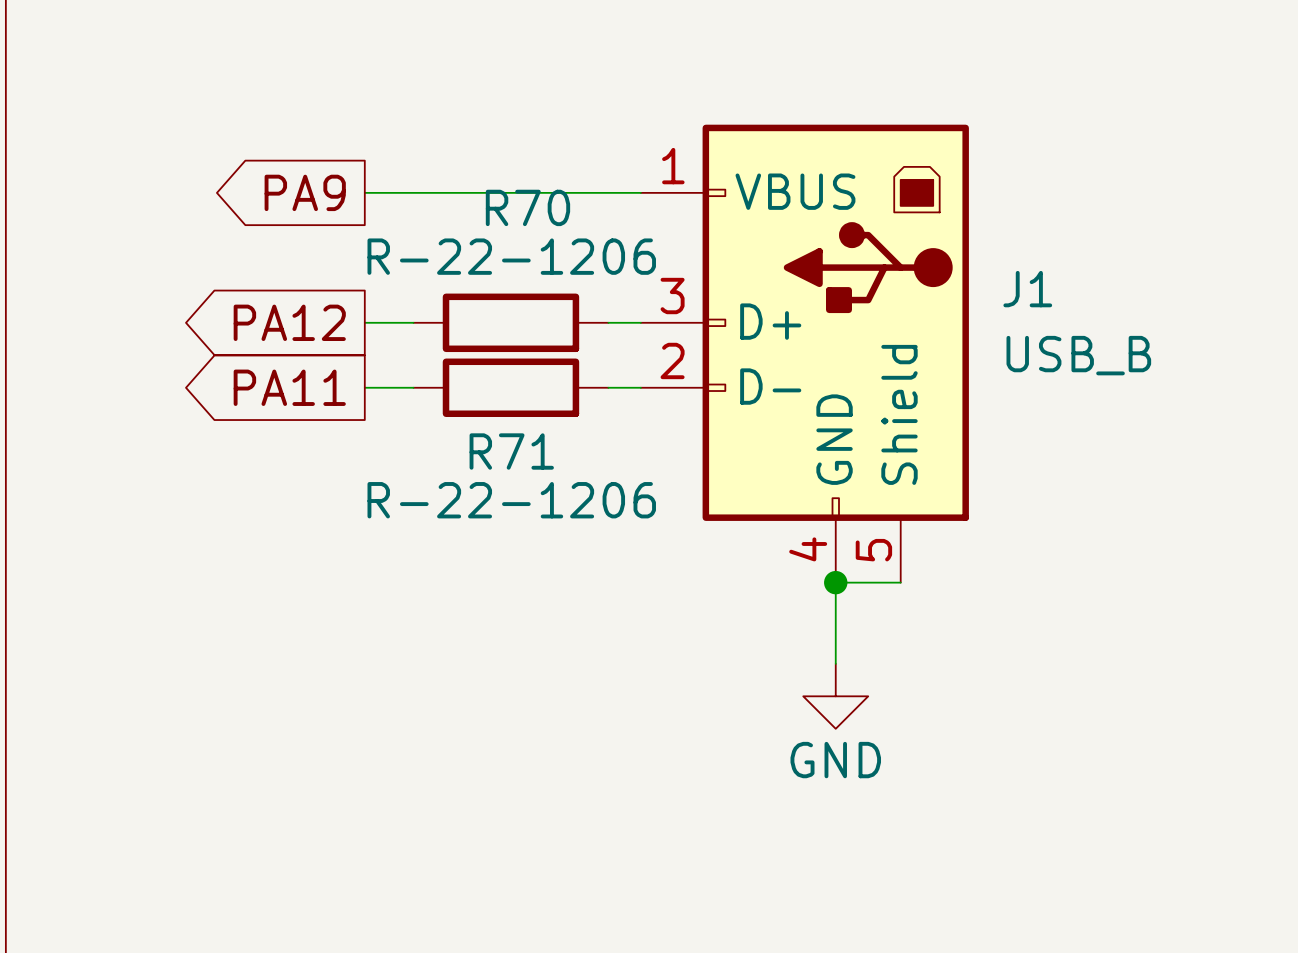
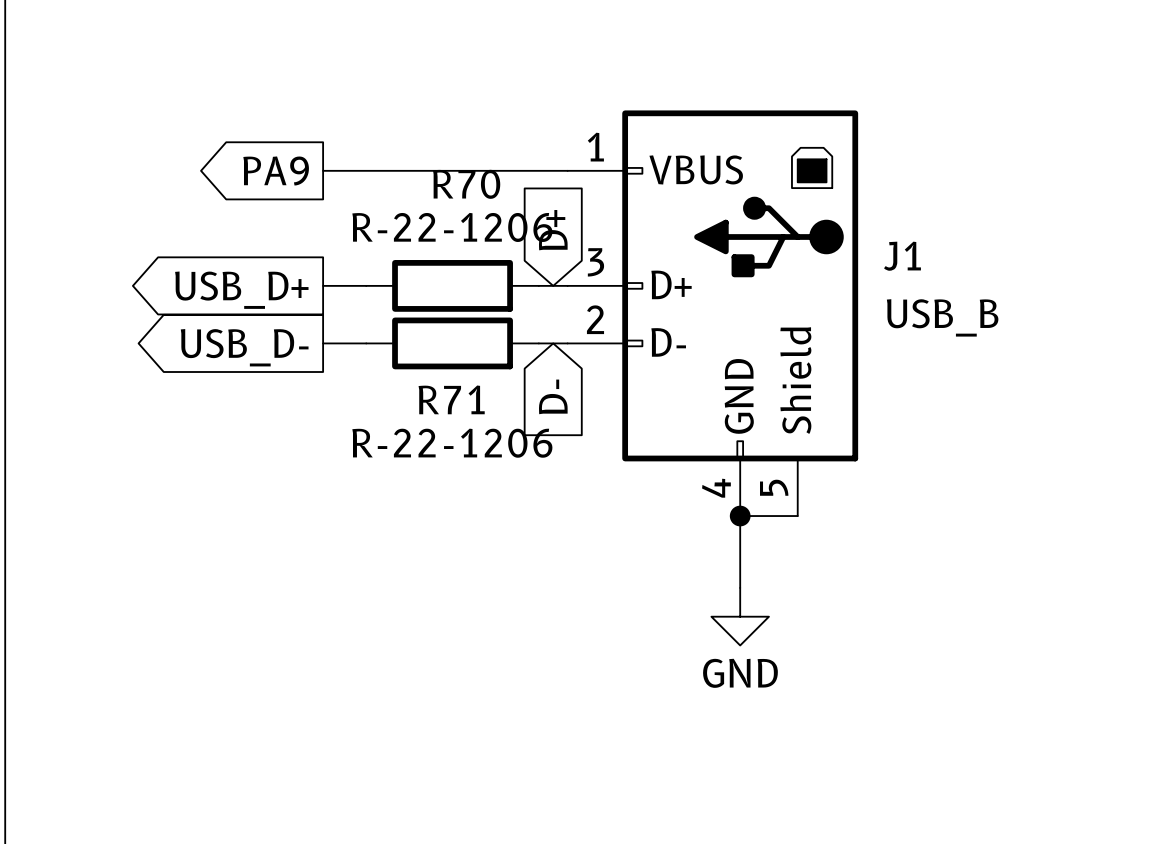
global label: none -> D+ (553, 230)
global label: PA12 (289, 322) -> USB_D+ (241, 290)
global label: PA11 (289, 387) -> USB_D- (244, 347)
global label: none -> D- (553, 396)

